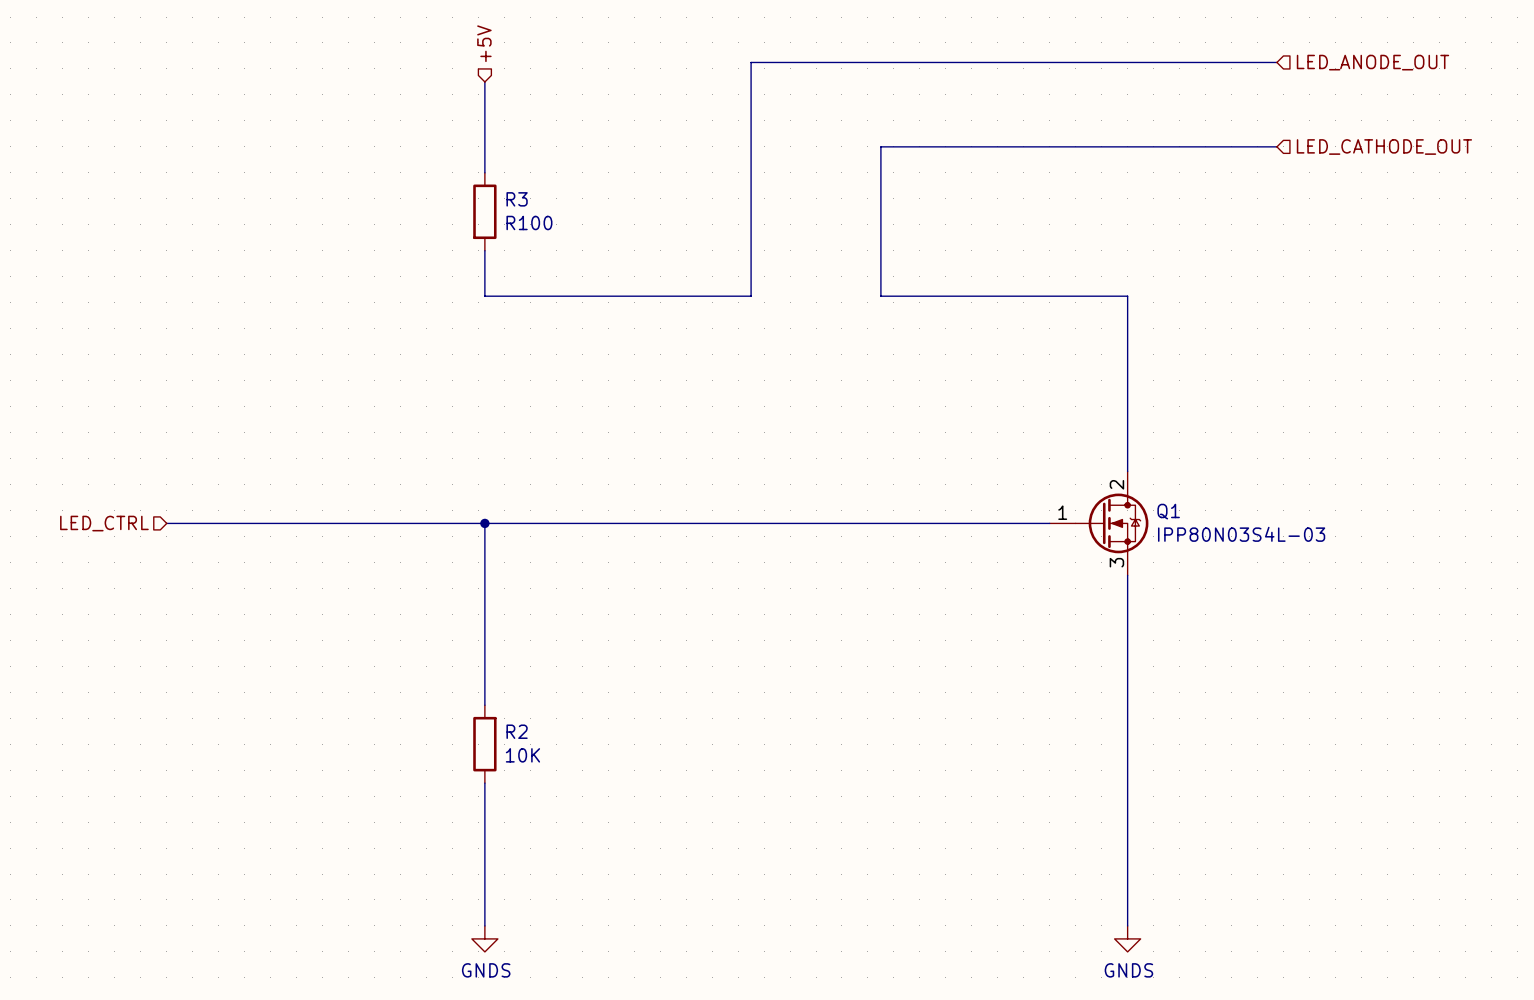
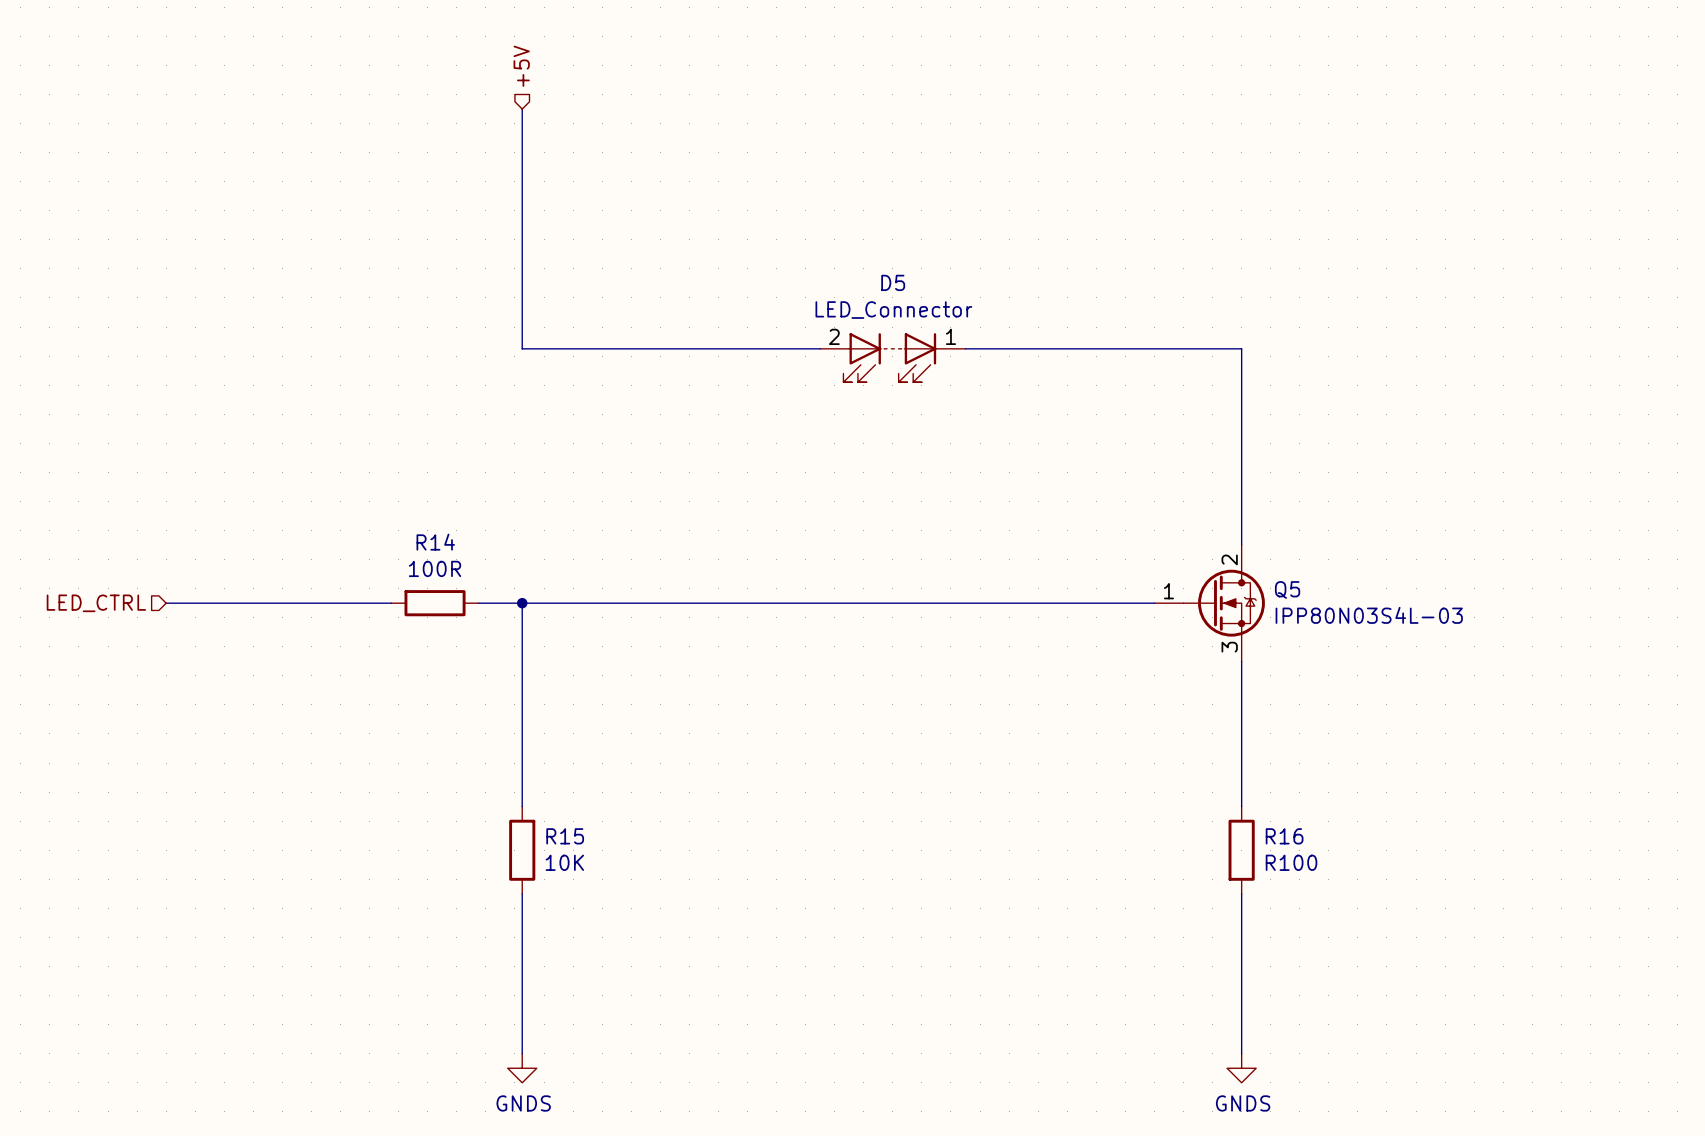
wire: (1276, 62) (751, 62) (751, 296) -> none
hierarchical label: LED_ANODE_OUT (1372, 62) -> none
wire: (1276, 146) (880, 146) (880, 296) -> none
hierarchical label: LED_CATHODE_OUT (1384, 147) -> none
wire: none -> (522, 210) (522, 297)
R3: R100 (484, 211) -> none
D5: none -> LED_Connector (892, 357)
Q1 name: Q1 (1168, 511) -> Q5 (1287, 589)
wire: (368, 523) (445, 523) -> none
R14: none -> 100R (435, 603)
wire: (1127, 705) (1127, 783) -> none
R2 name: R2 (517, 731) -> R15 (565, 836)
R16: none -> R100 (1241, 850)

